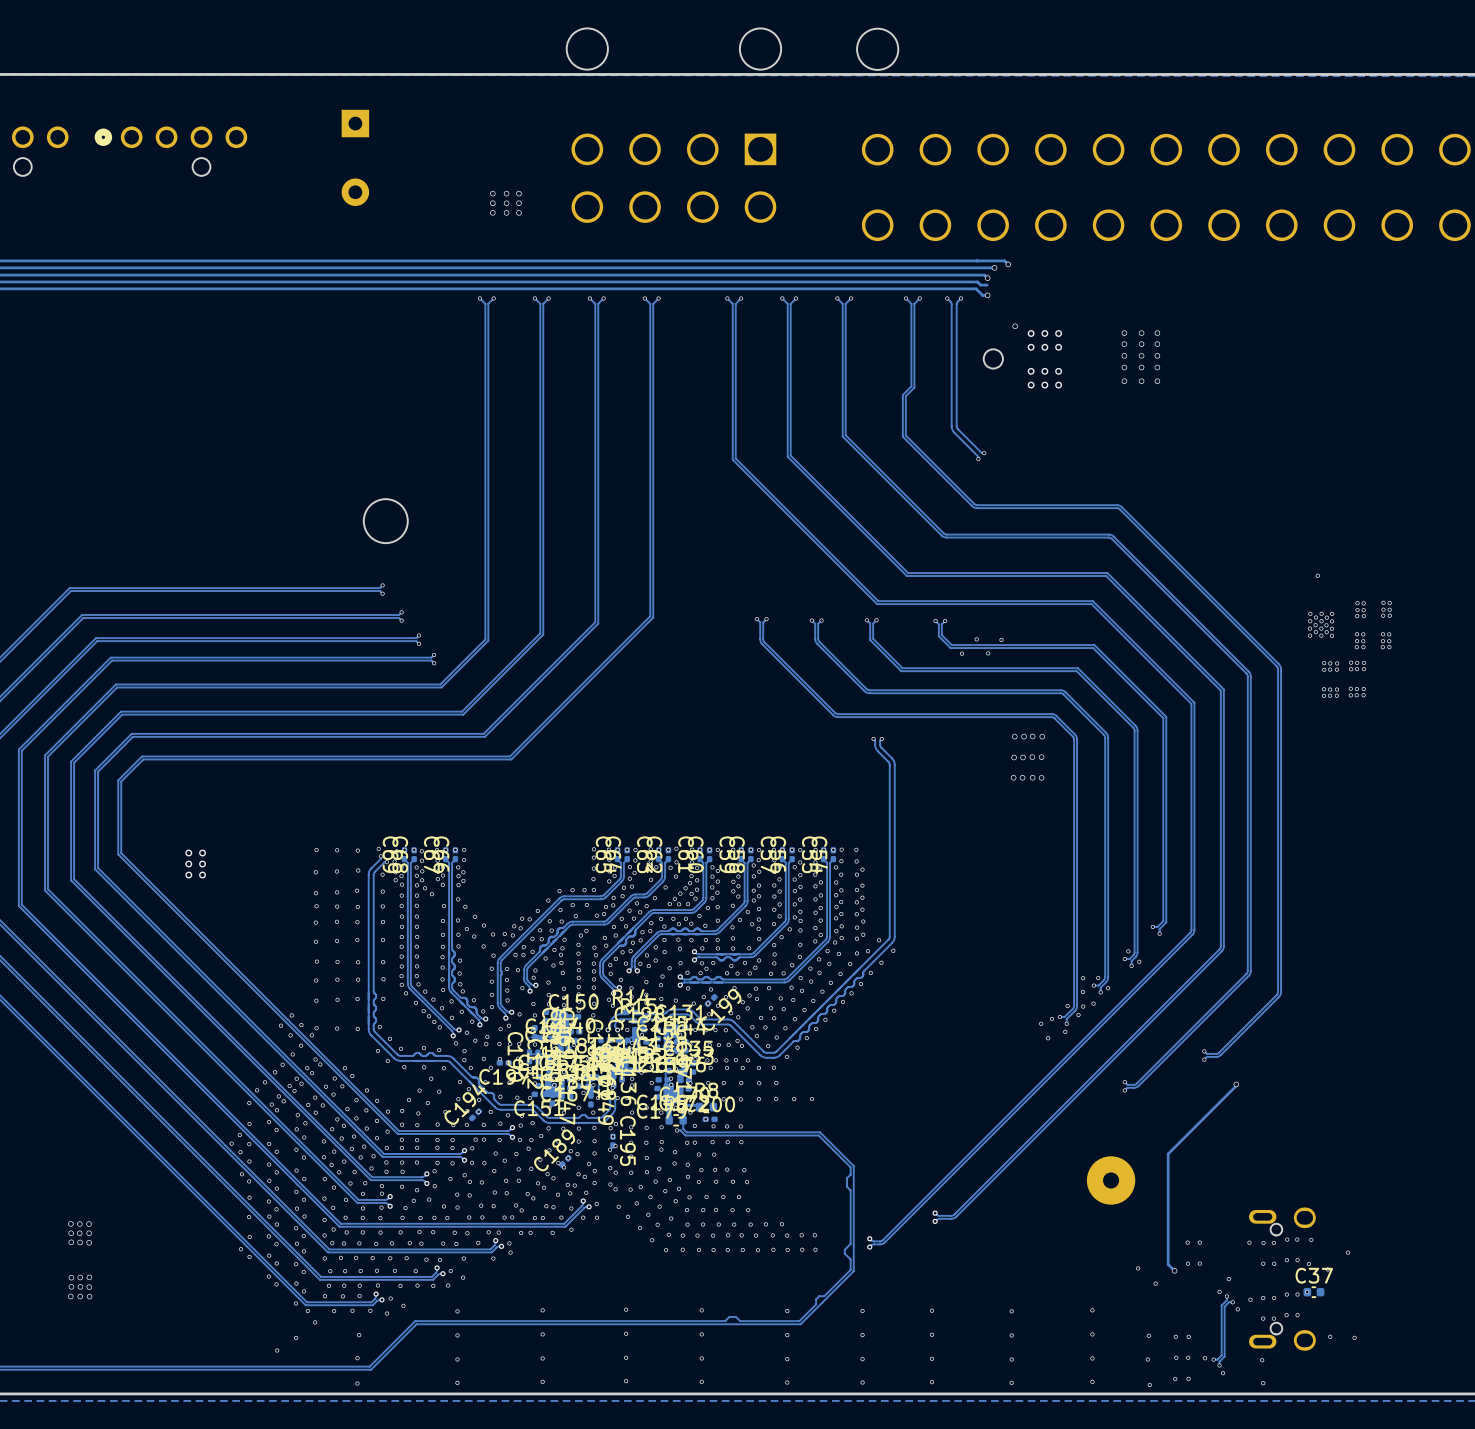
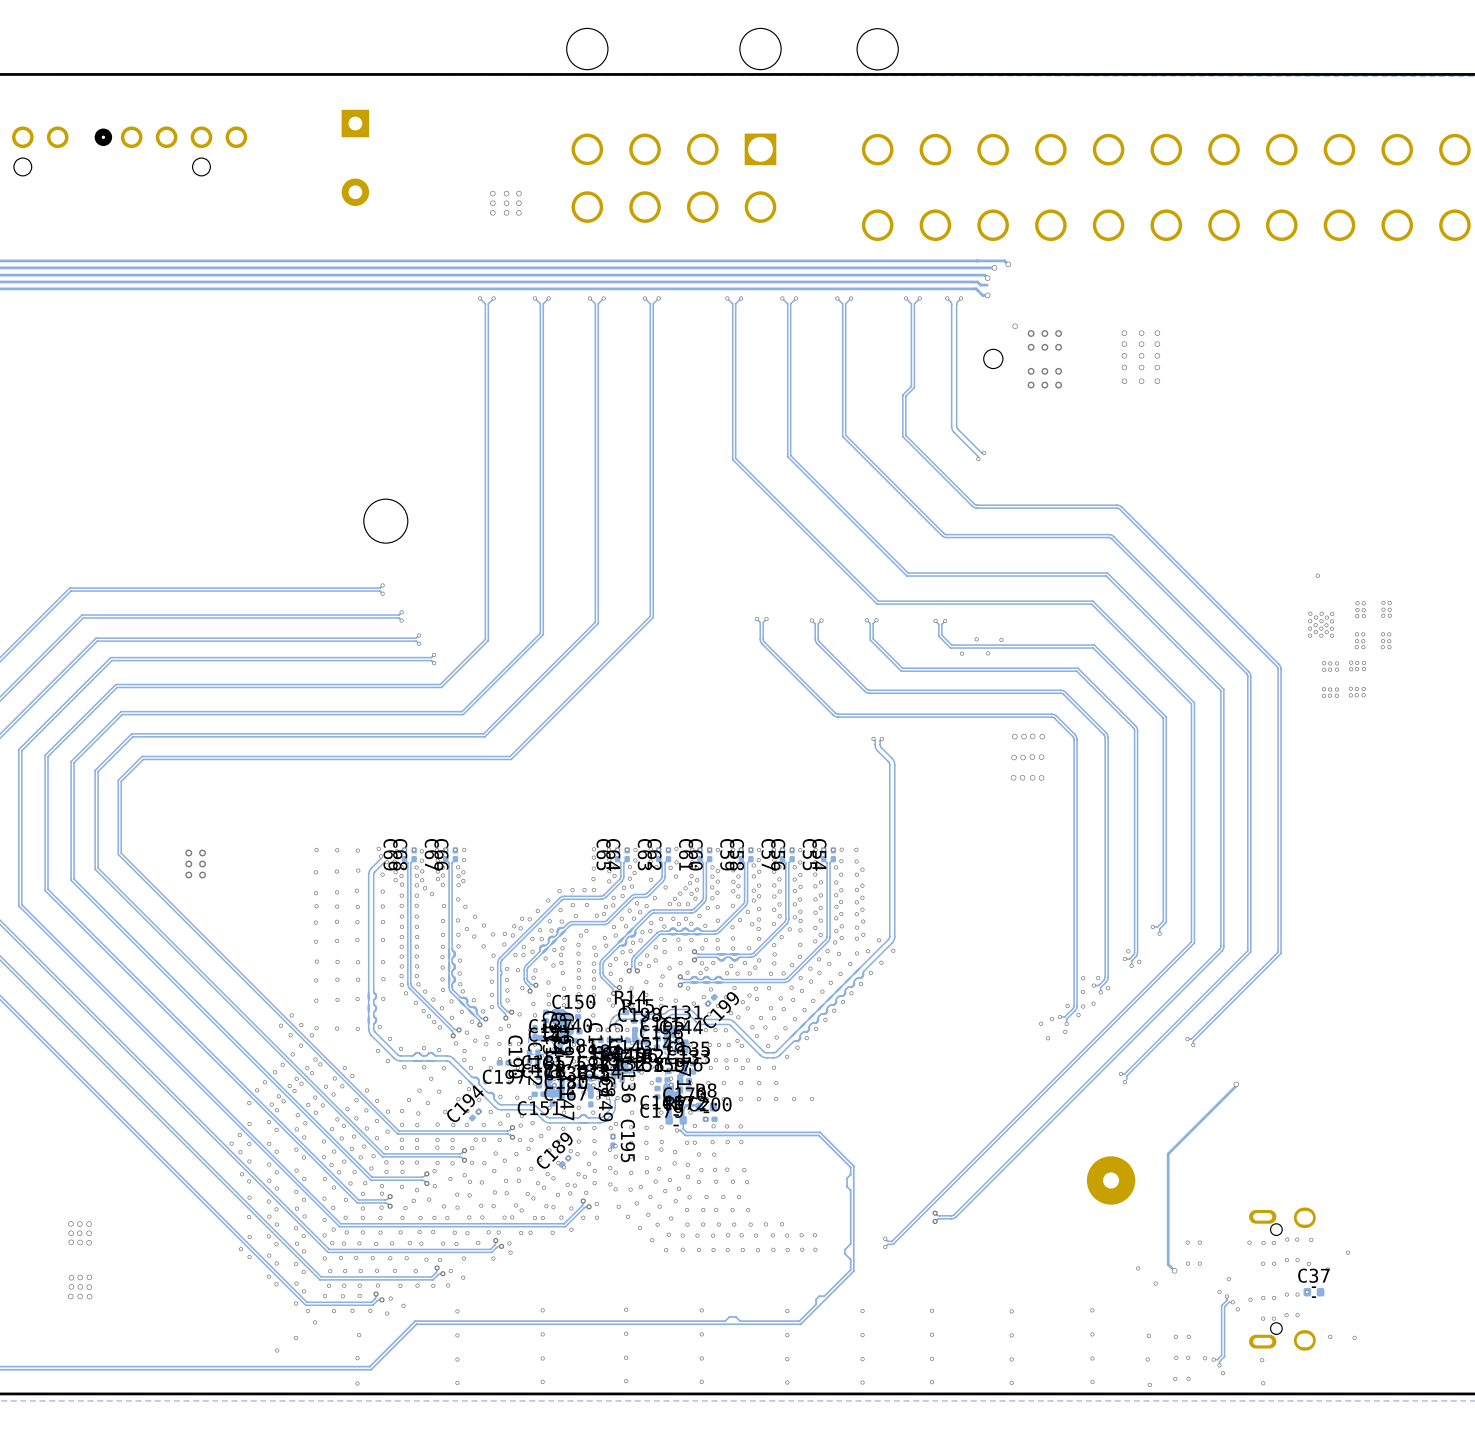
track: (1191, 929) (882, 1240) (873, 1241) (869, 1238) -> (1191, 929) (1191, 941) (891, 1241) (885, 1238)
track: (1194, 929) (1192, 934) (884, 1242) (869, 1247) -> (1194, 929) (1194, 943) (893, 1244) (887, 1244) (885, 1247)
track: (1247, 950) (1246, 973) (1136, 1083) (1127, 1084) (1124, 1082) -> (1247, 950) (1124, 1073) (1120, 1073)
track: (1250, 952) (1250, 971) (1248, 975) (1138, 1085) (1127, 1087) (1124, 1090) -> (1250, 952) (1126, 1076) (1126, 1079)
track: (1278, 952) (1277, 994) (1218, 1053) (1206, 1054) (1204, 1051) -> (1278, 952) (1191, 1039) (1187, 1039)
track: (1281, 953) (1279, 995) (1220, 1055) (1206, 1056) (1204, 1059) -> (1281, 953) (1193, 1041) (1193, 1044)
via: none -> (1187, 1039)
via: none -> (1193, 1044)
via: (1204, 1051) -> none
via: (1204, 1059) -> none
via position: (1124, 1090) -> (1120, 1073)
via: (869, 1238) -> none
via: none -> (885, 1238)
via: (869, 1247) -> none
via: none -> (885, 1247)

